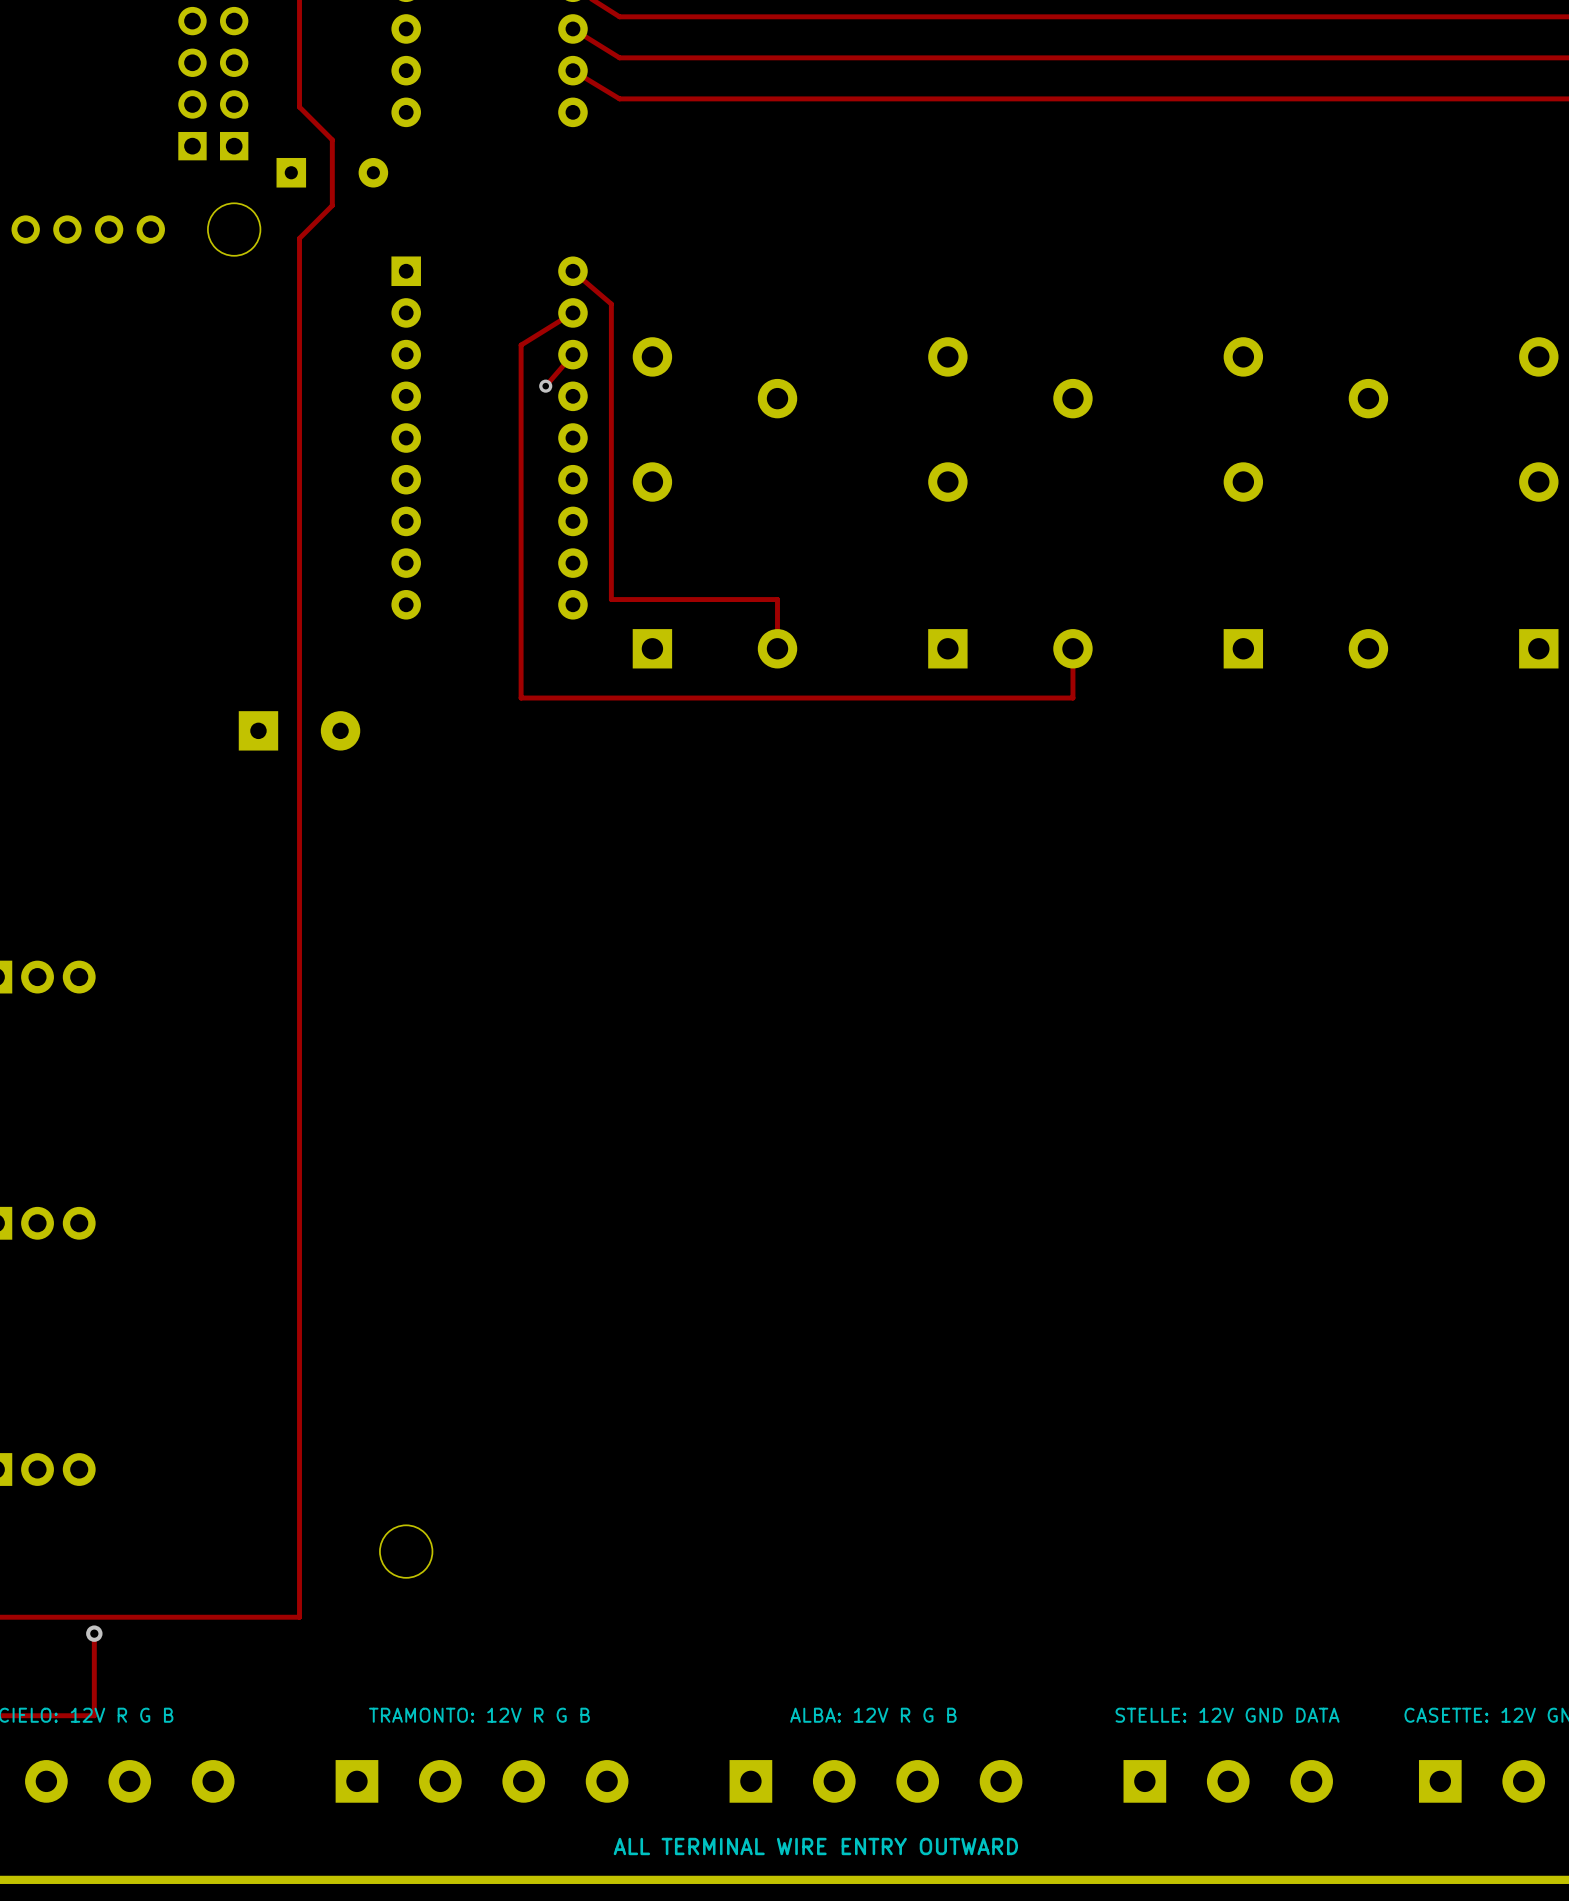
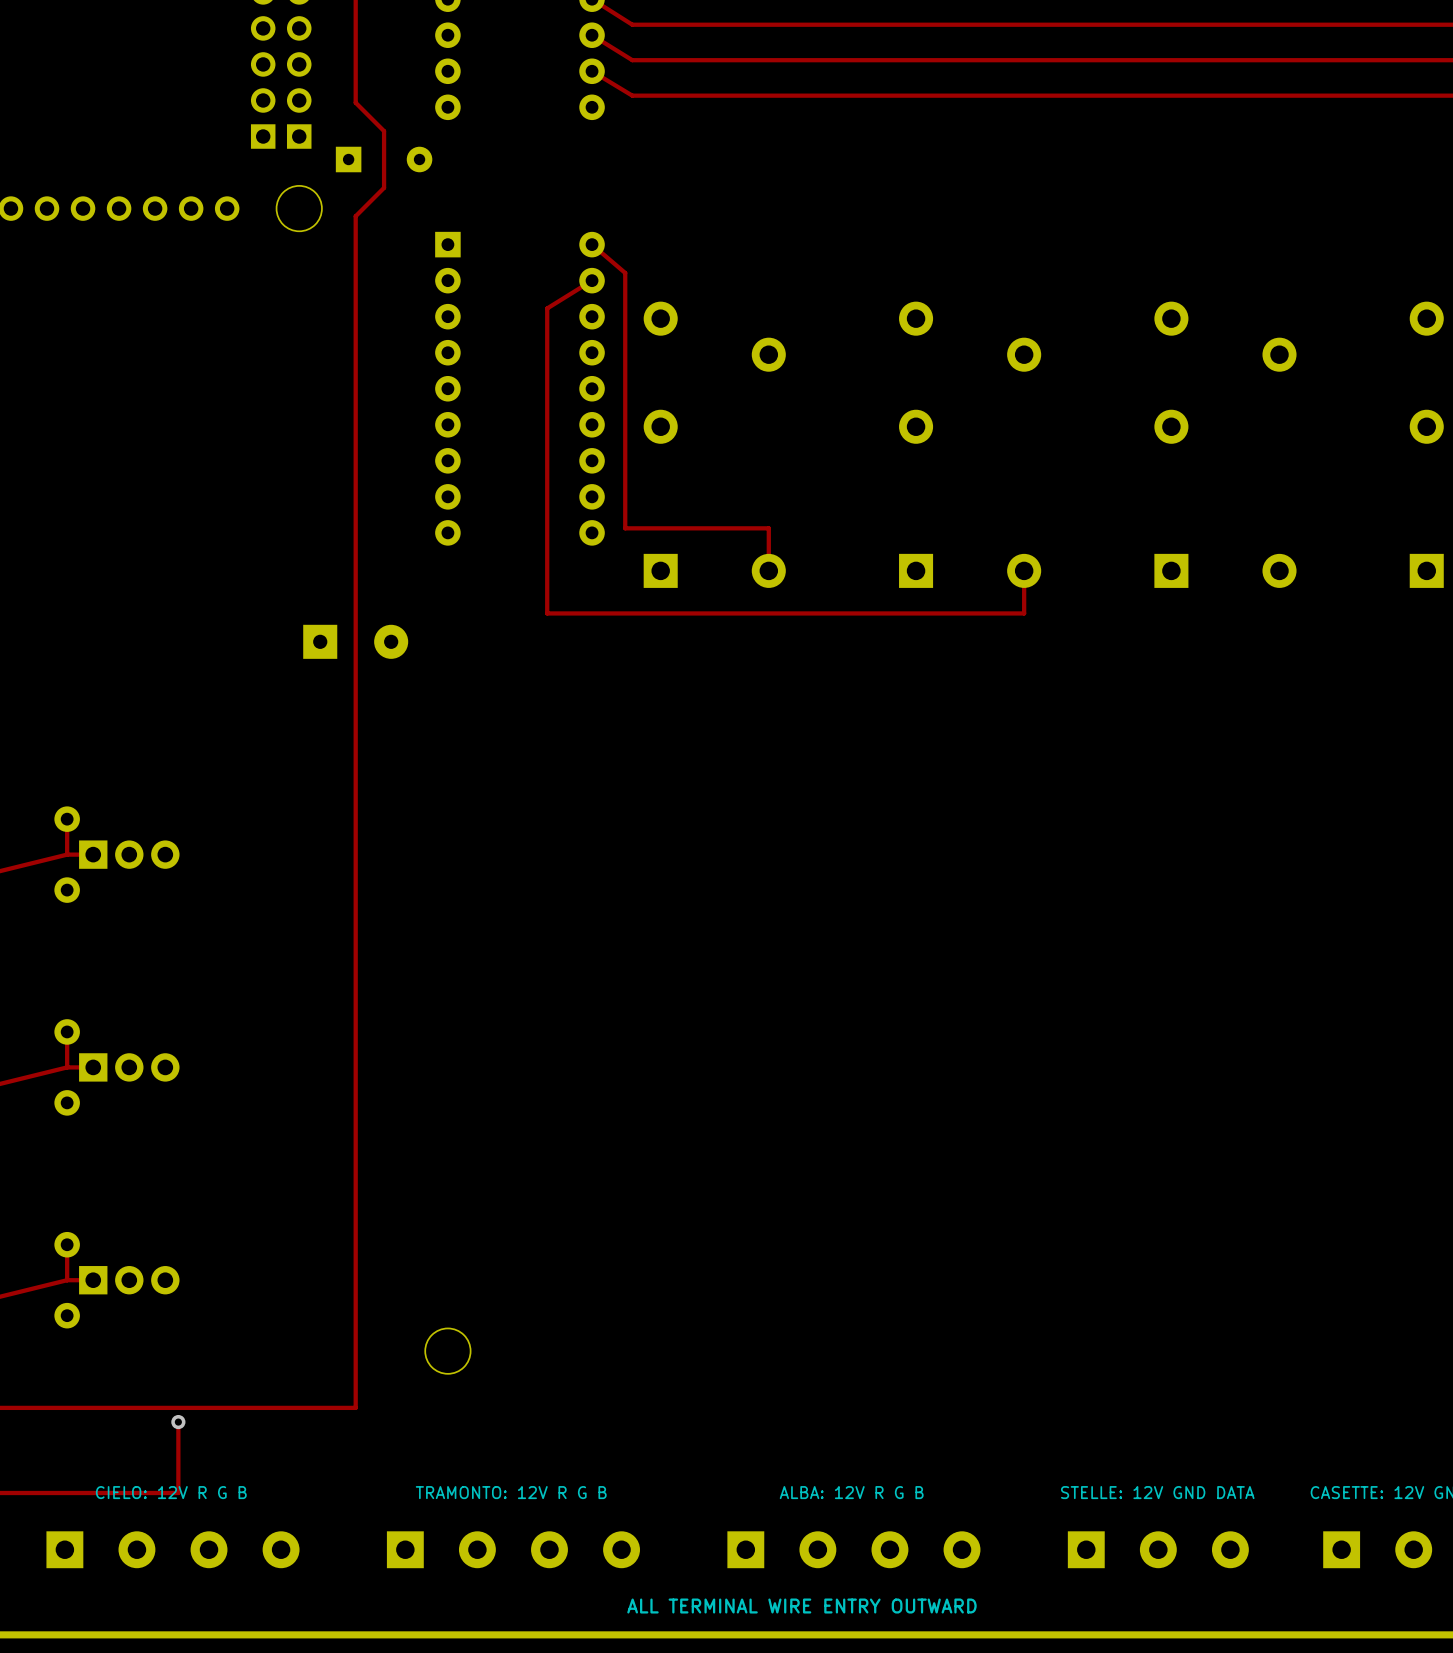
track: (572, 354) (545, 386) -> none
via: (545, 386) -> none

